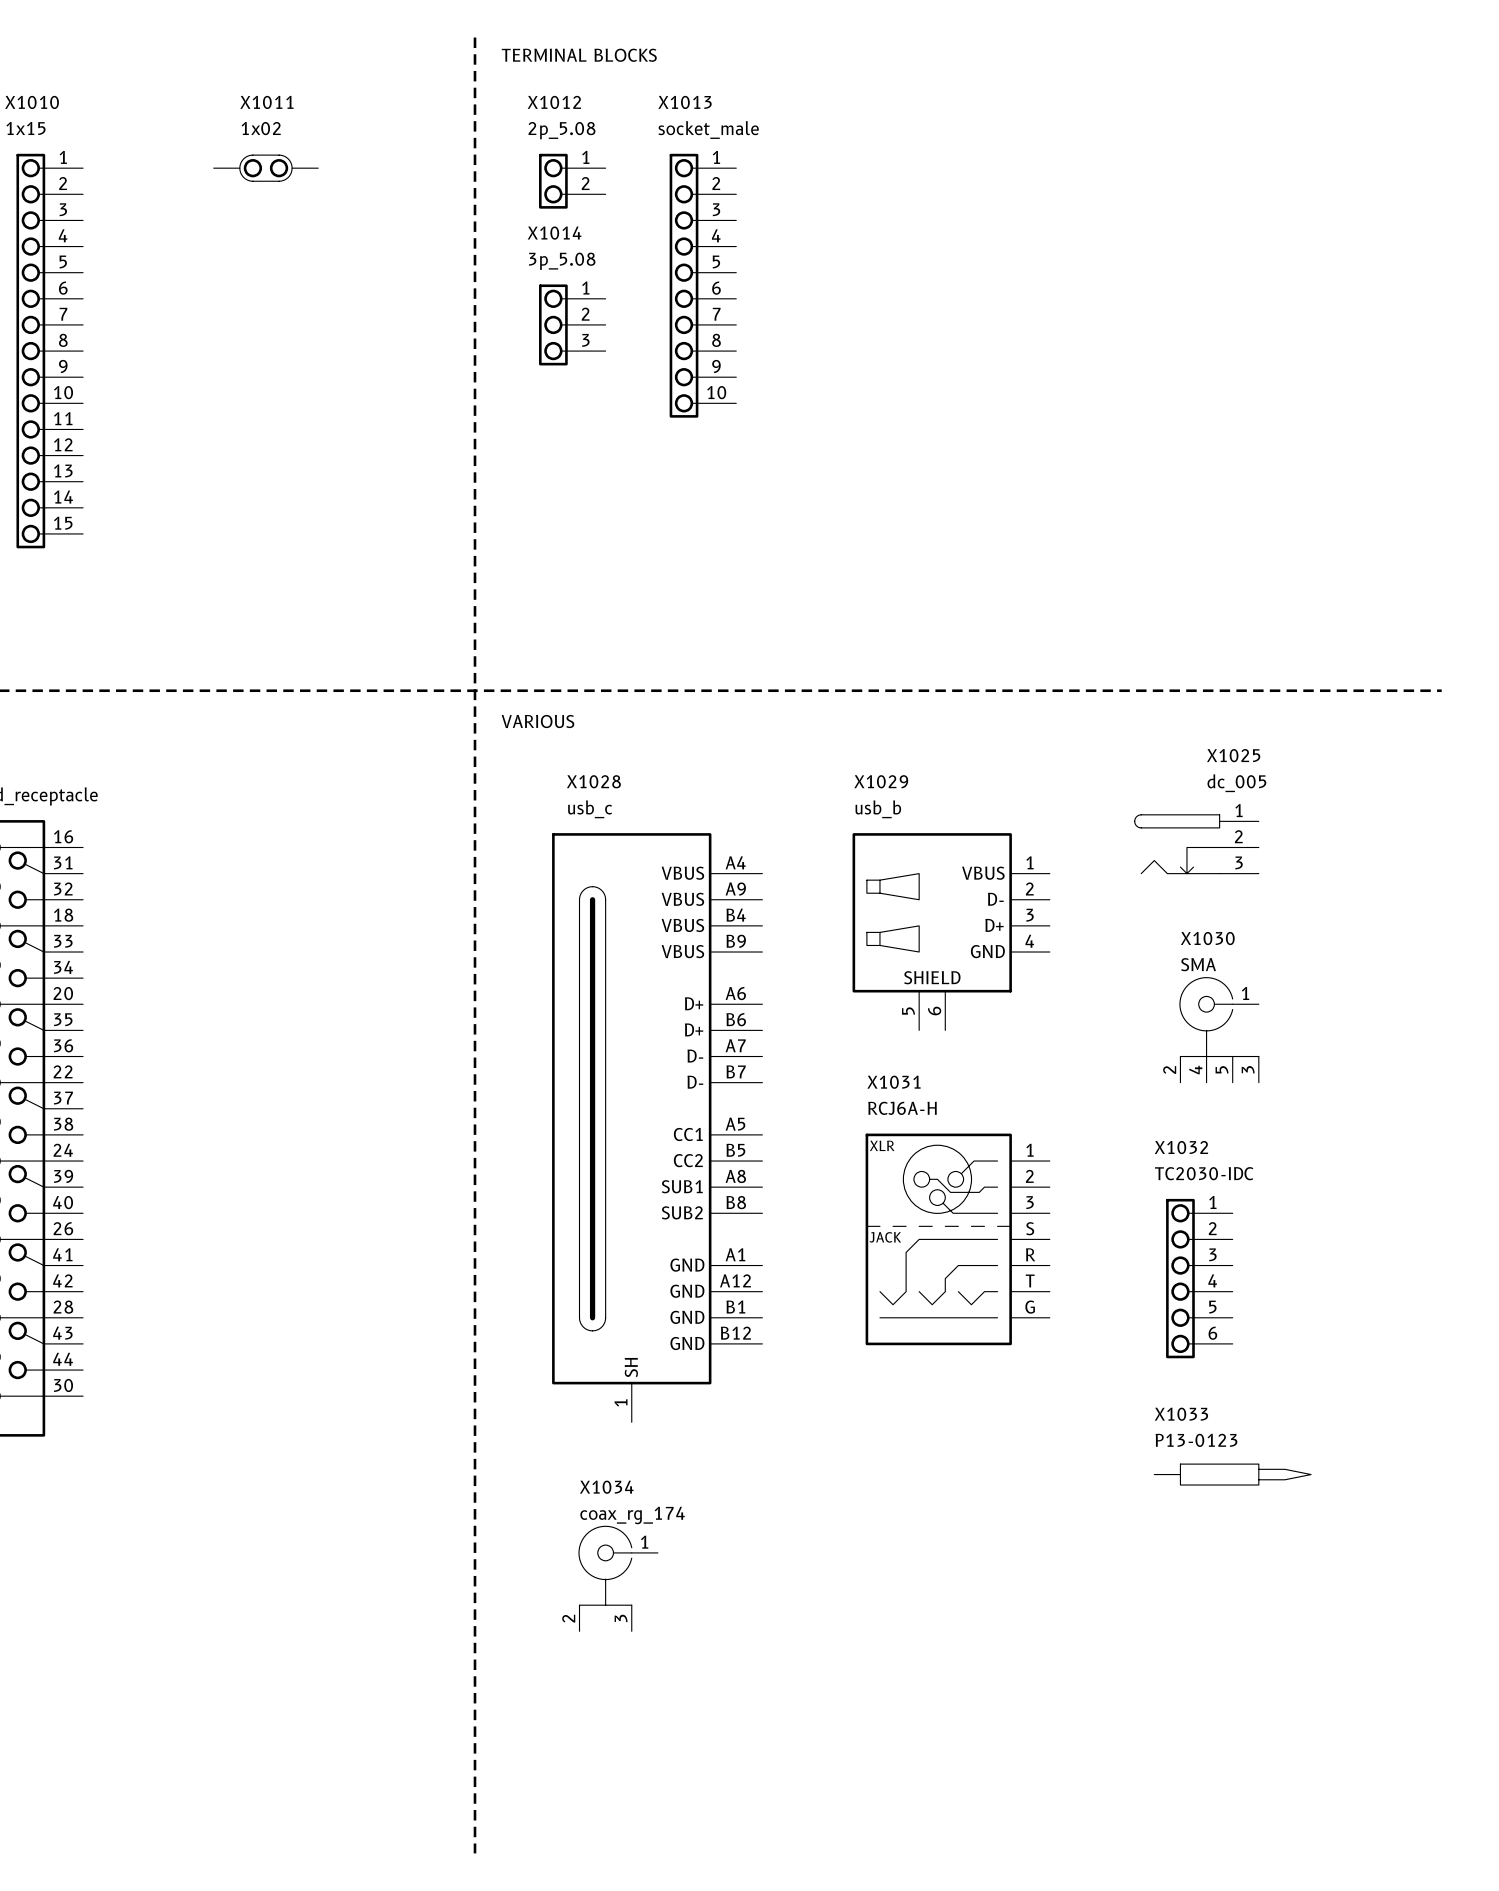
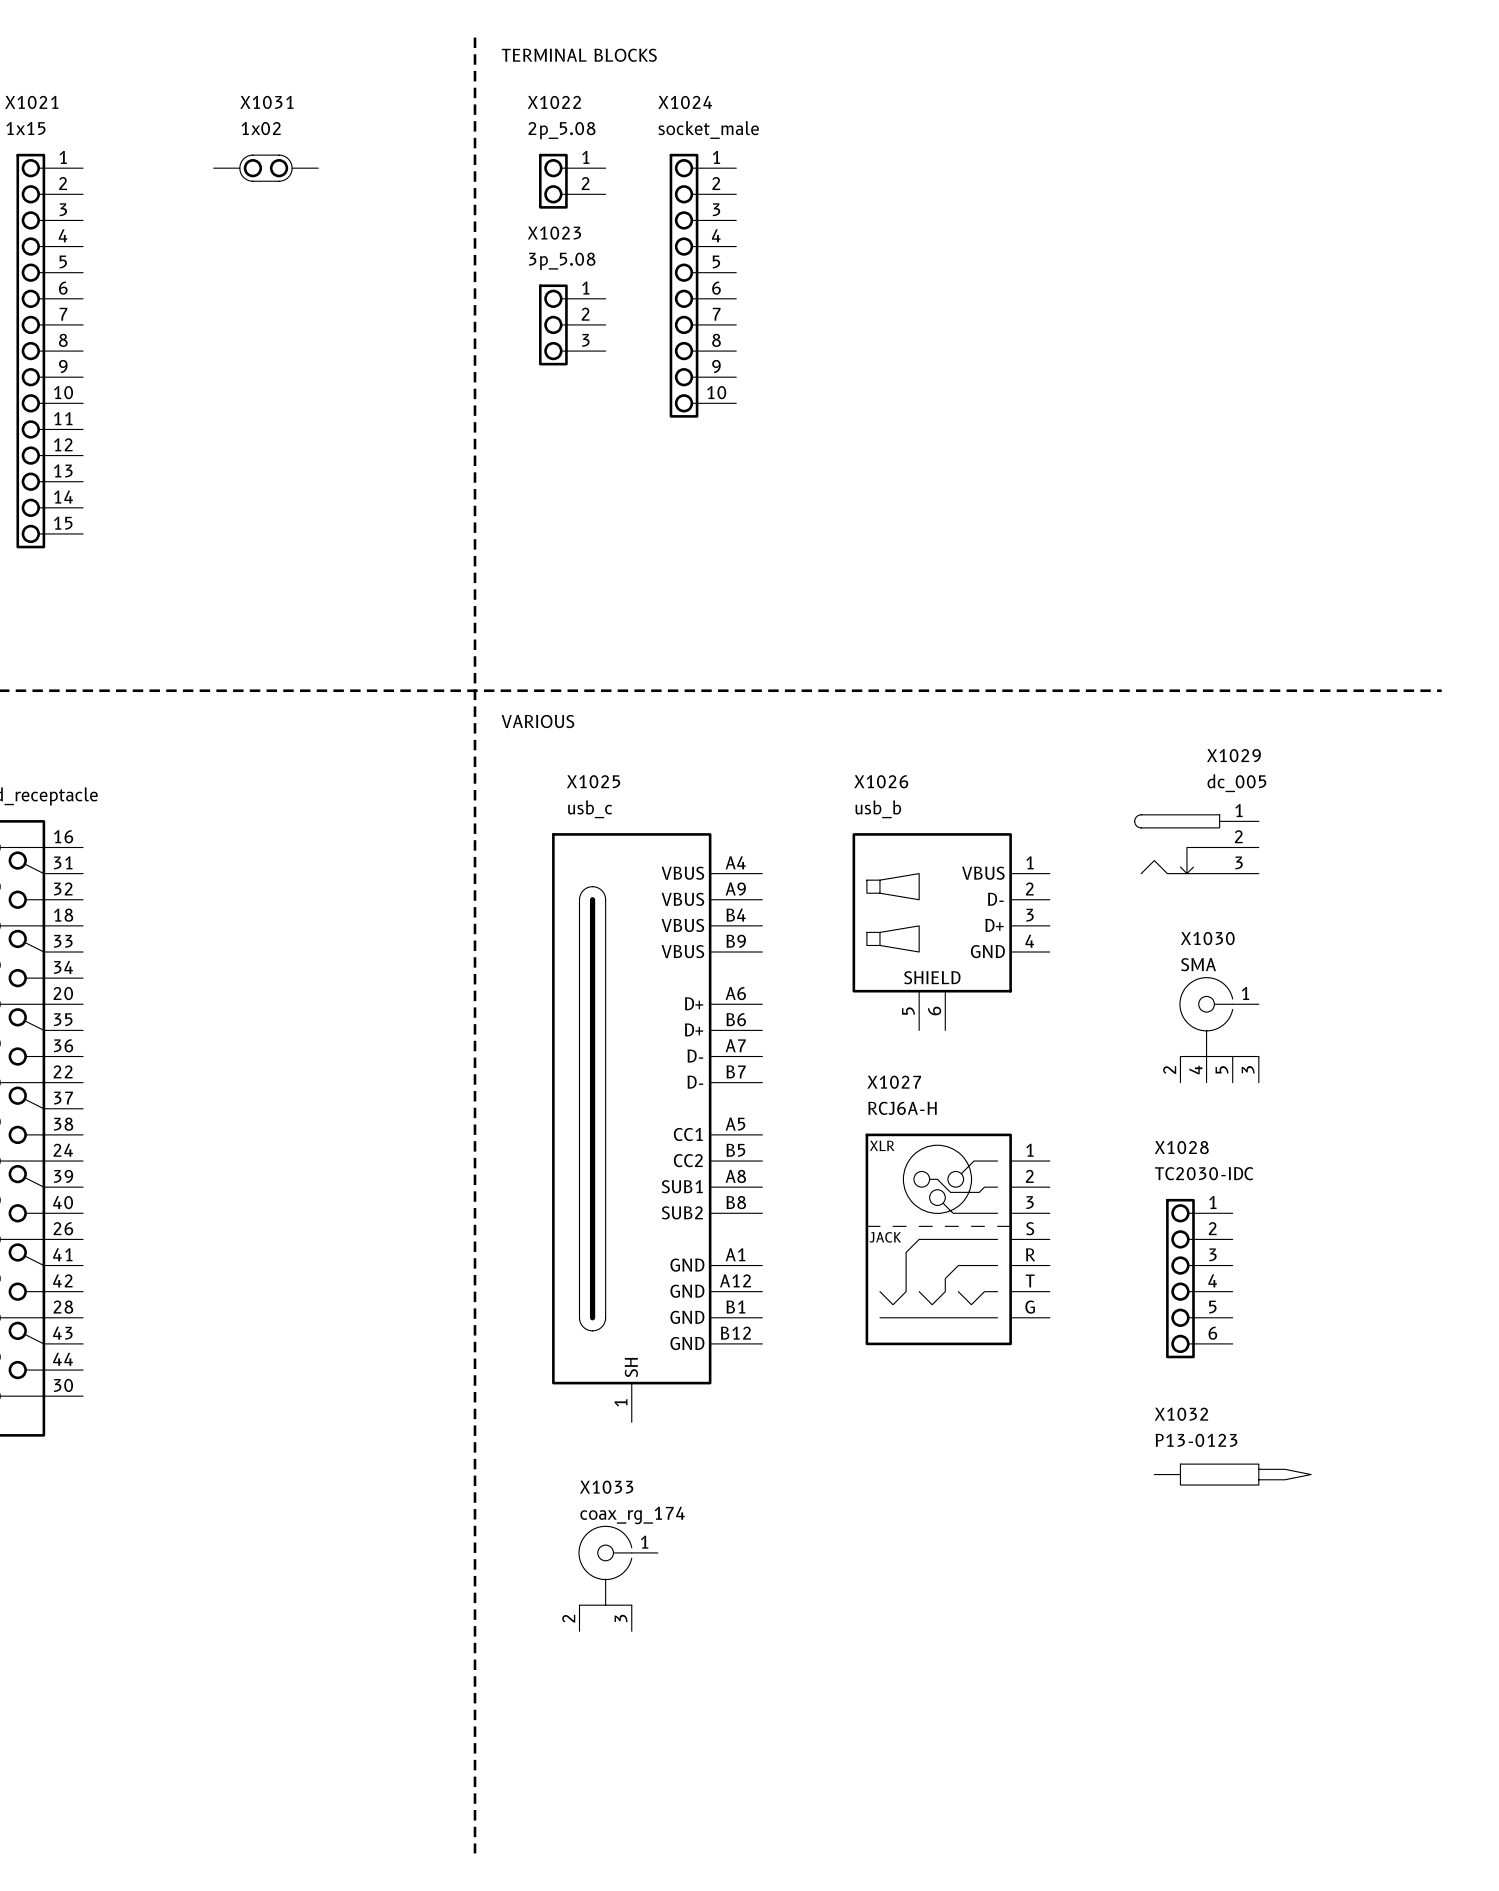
X1010 name: X1010 (32, 102) -> X1021 (31, 102)
X1011 name: X1011 (266, 102) -> X1031 (266, 102)
X1012 name: X1012 (554, 102) -> X1022 (554, 102)
X1013 name: X1013 (685, 102) -> X1024 (685, 102)
X1014 name: X1014 (554, 233) -> X1023 (554, 233)
X1025 name: X1025 (1233, 755) -> X1029 (1233, 755)
X1028 name: X1028 (593, 781) -> X1025 (593, 781)
X1029 name: X1029 (881, 781) -> X1026 (881, 781)
X1031 name: X1031 (893, 1082) -> X1027 (894, 1082)
X1032 name: X1032 (1181, 1147) -> X1028 (1181, 1147)
X1033 name: X1033 (1181, 1414) -> X1032 (1181, 1414)
X1034 name: X1034 (606, 1487) -> X1033 (606, 1487)

